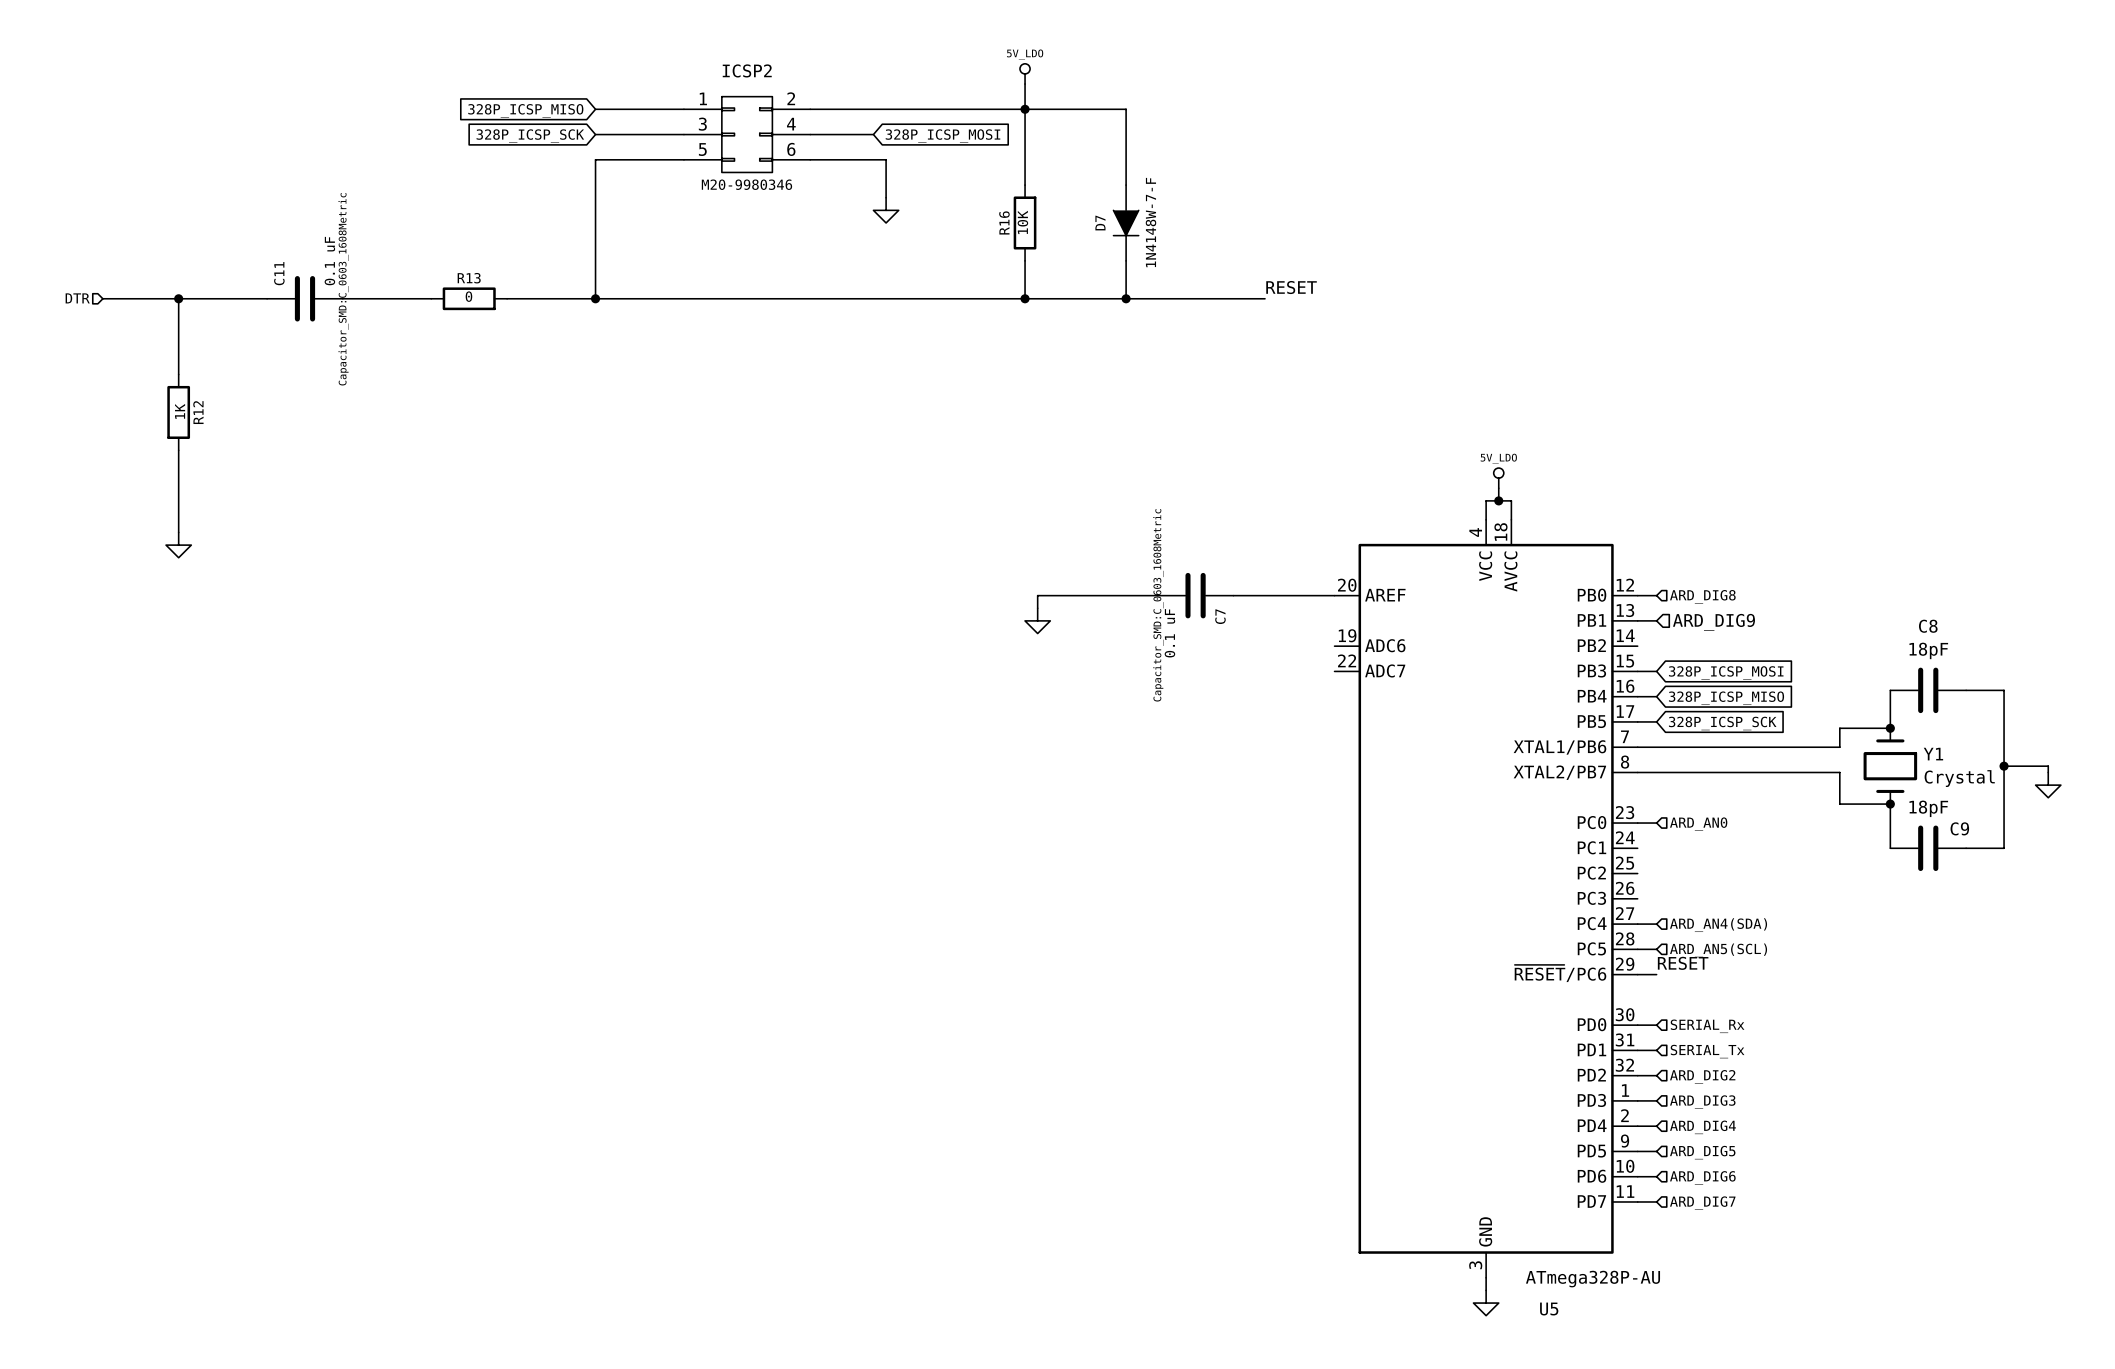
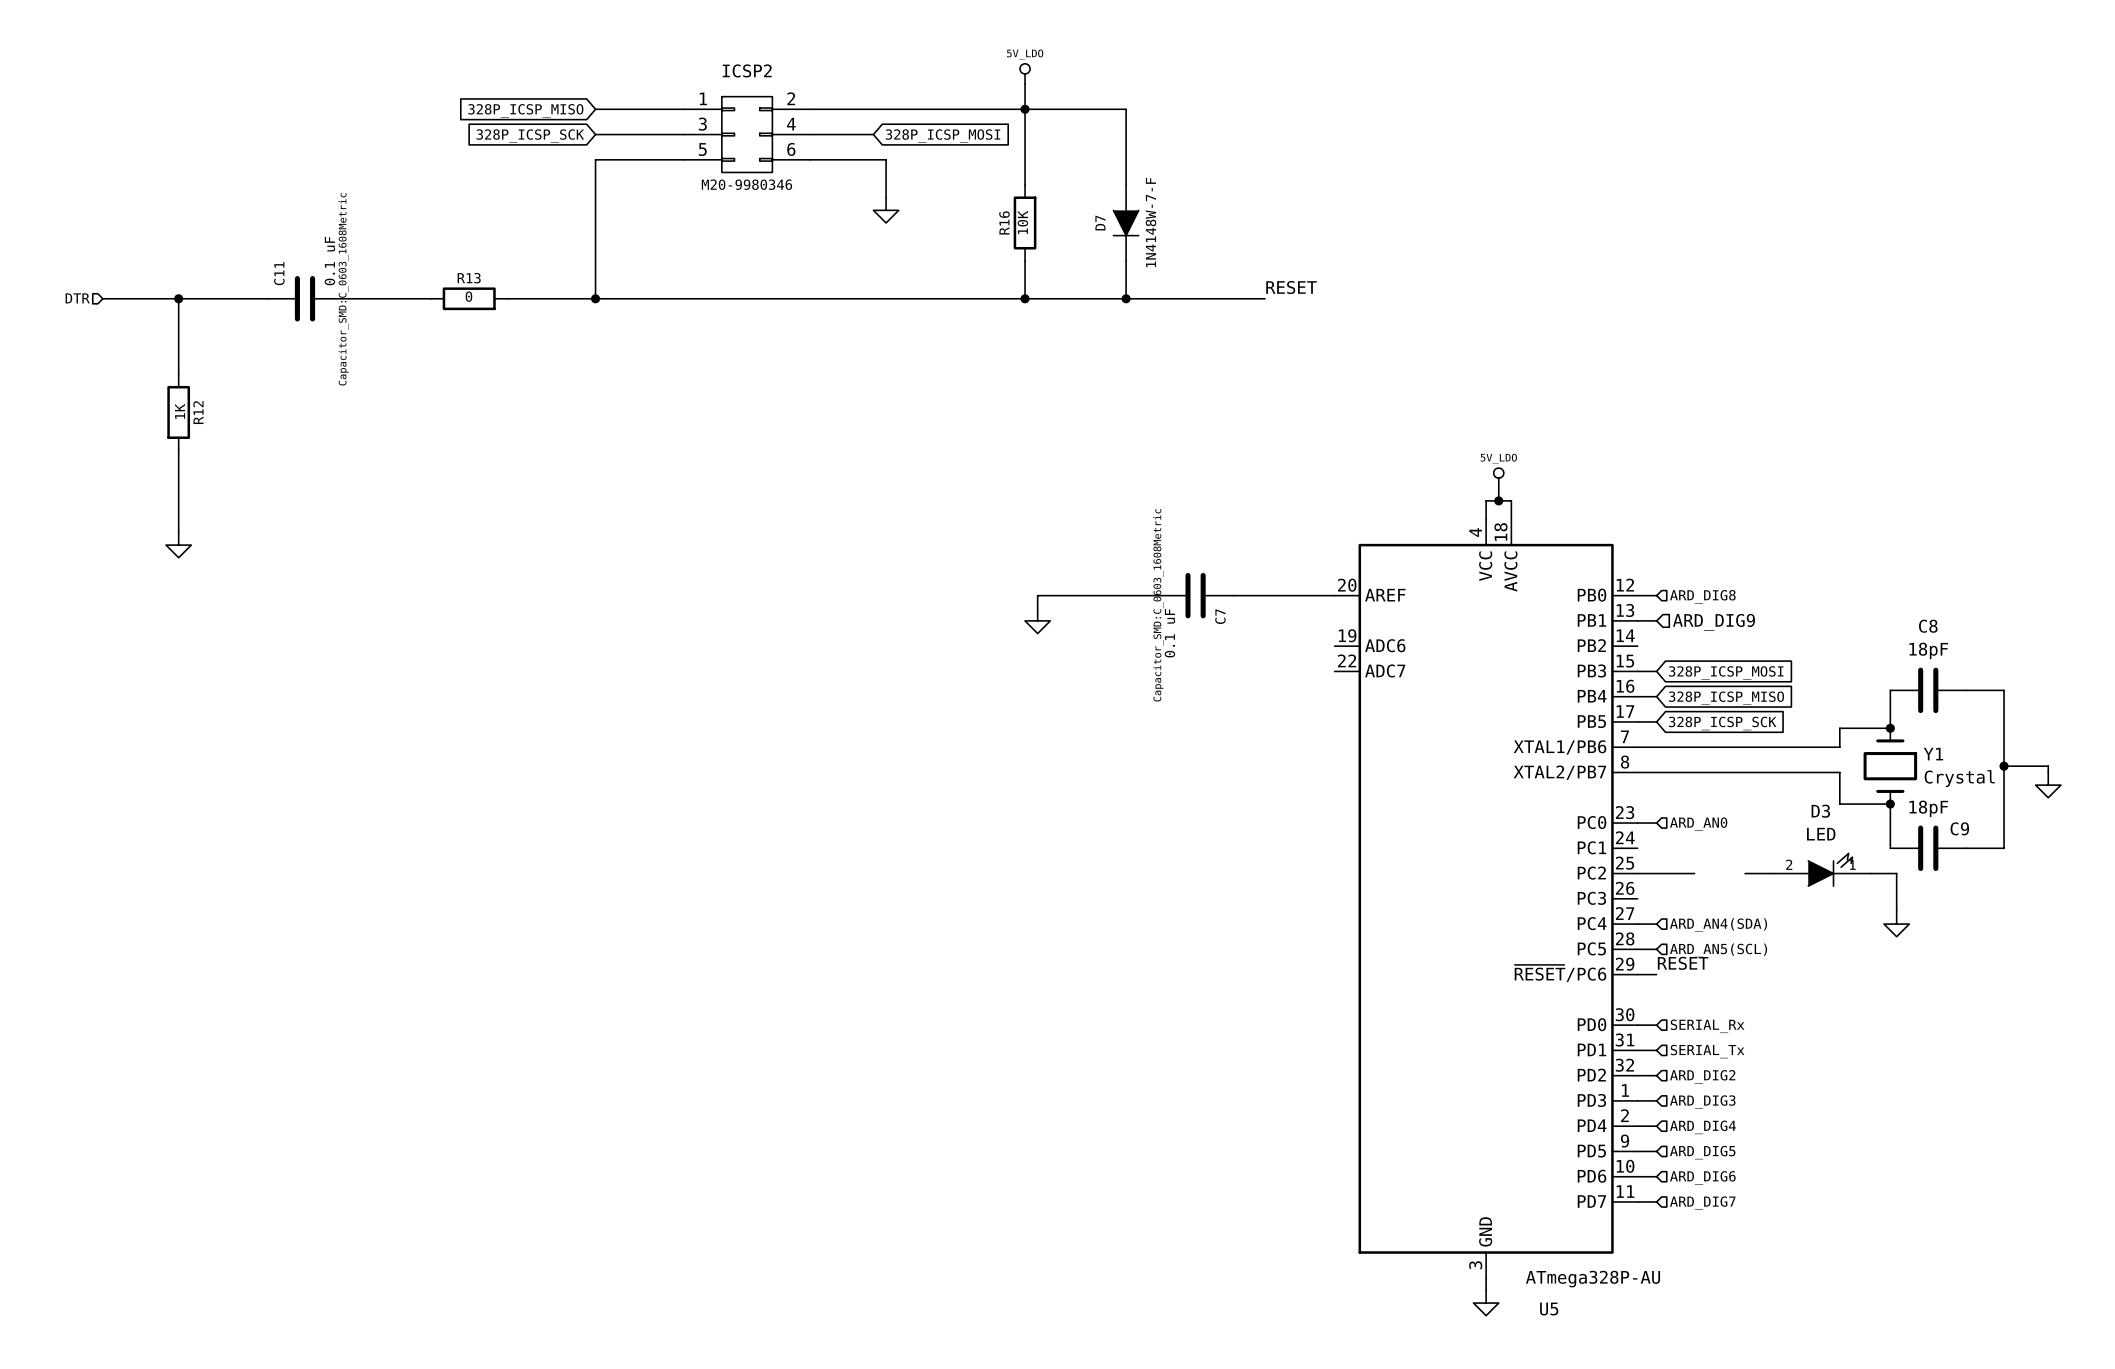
D3: none -> LED (1820, 869)
wire: none -> (1637, 873) (1694, 873)
wire: none -> (1745, 873) (1770, 873)
wire: none -> (1871, 873) (1896, 873) (1896, 911)
power symbol: none -> (1896, 924)

